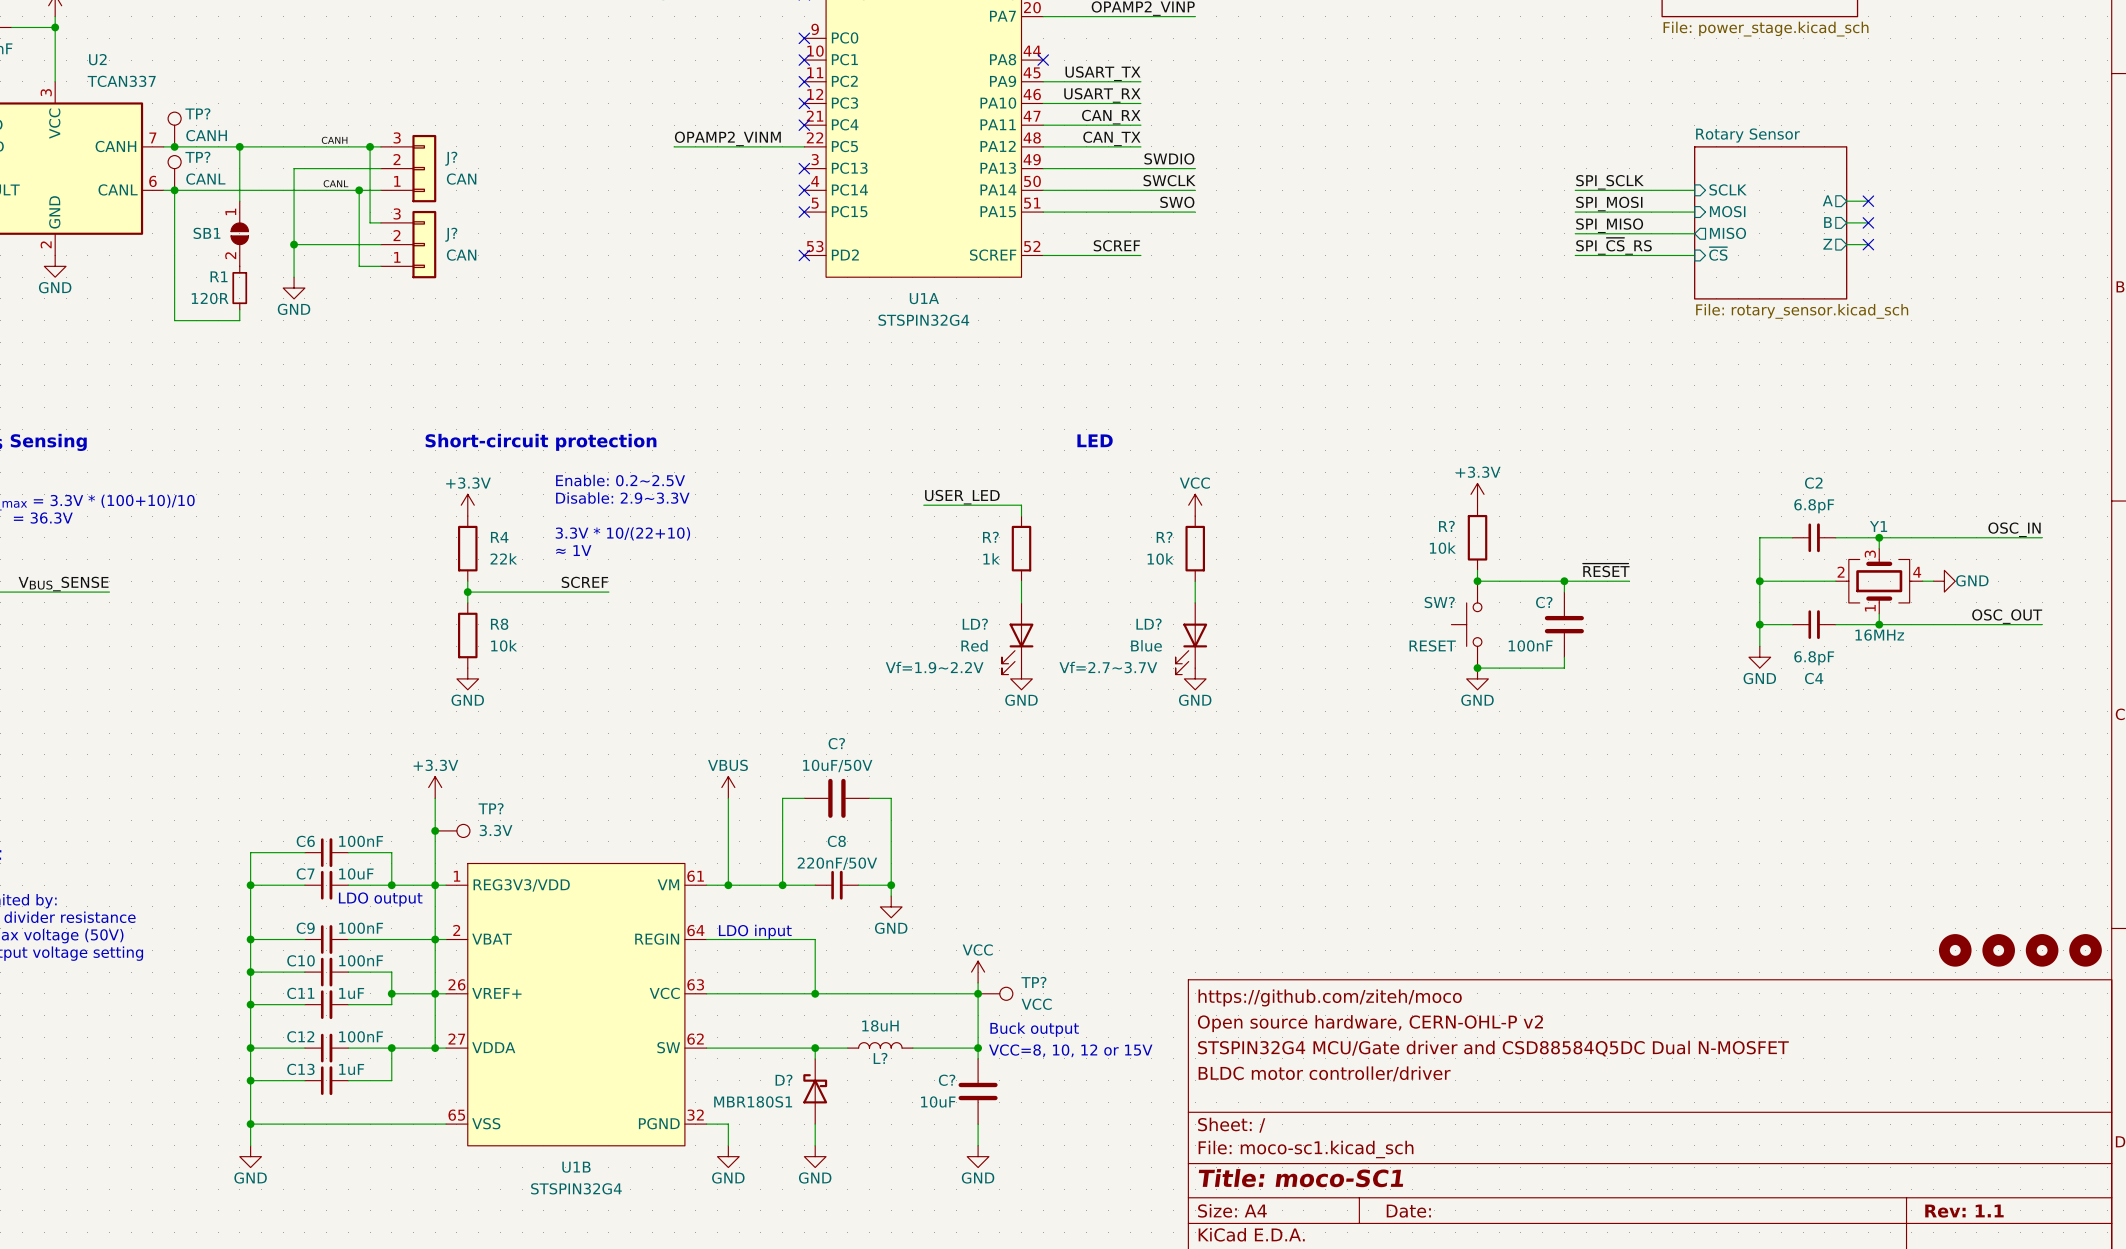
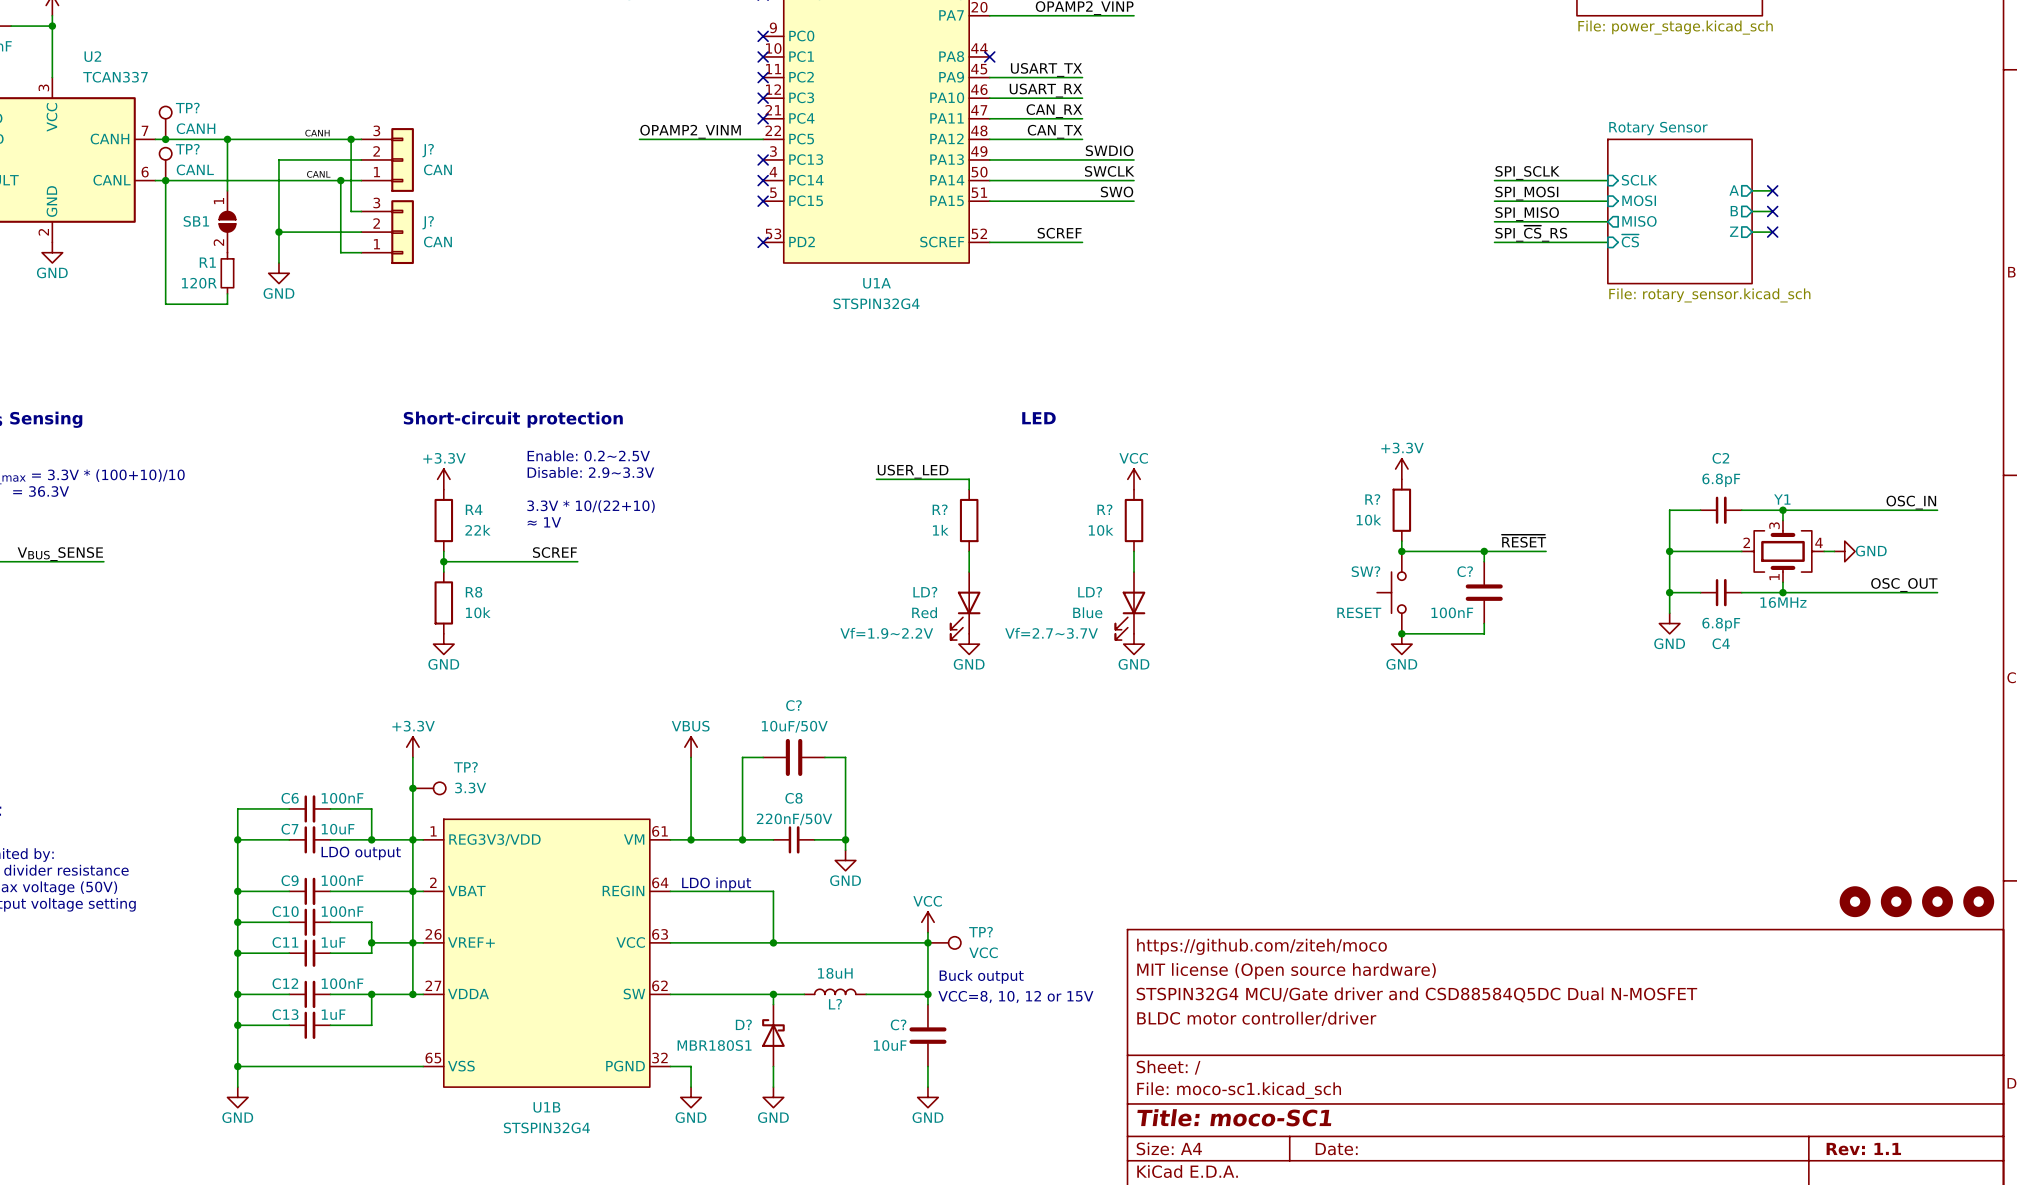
title block: Open source hardware, CERN-OHL-P v2 (1370, 1023) -> MIT license (Open source hardware) (1286, 971)

